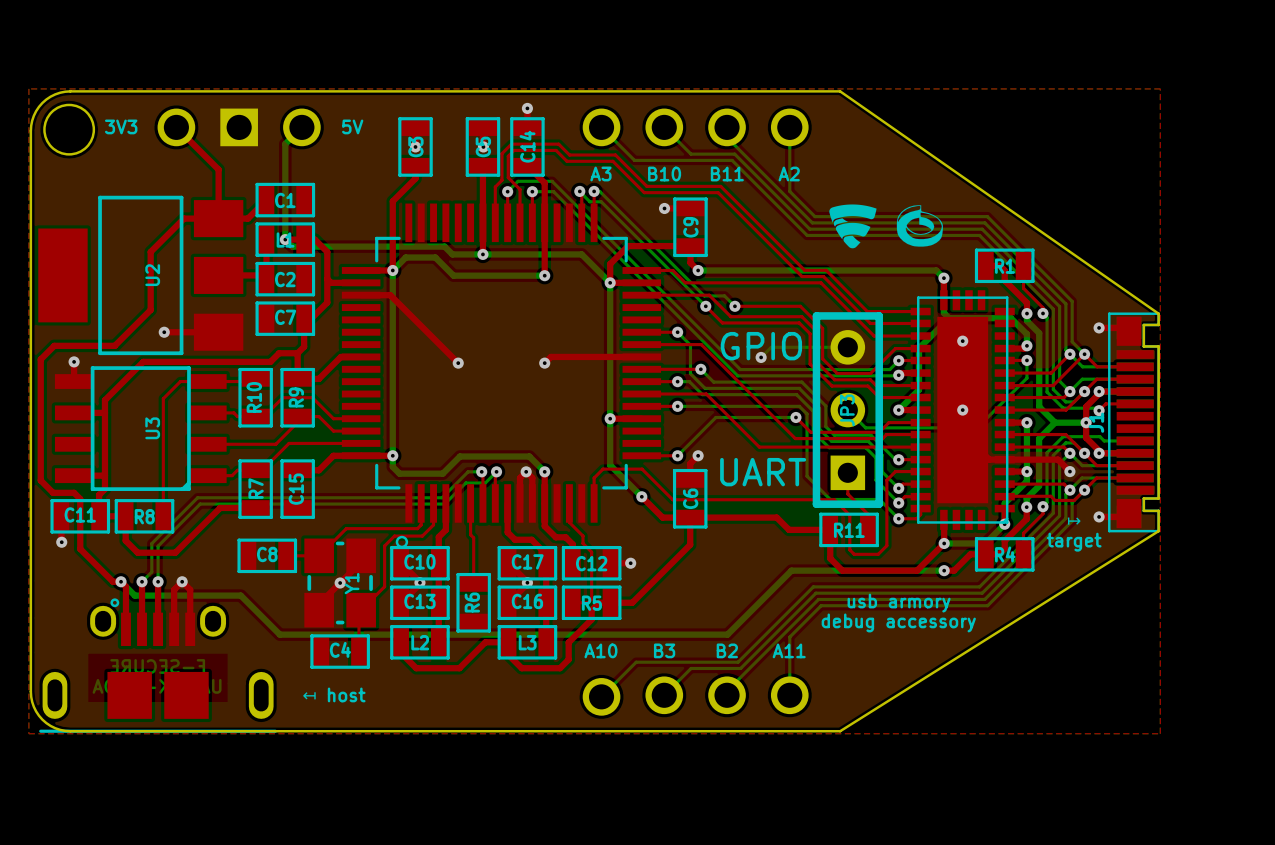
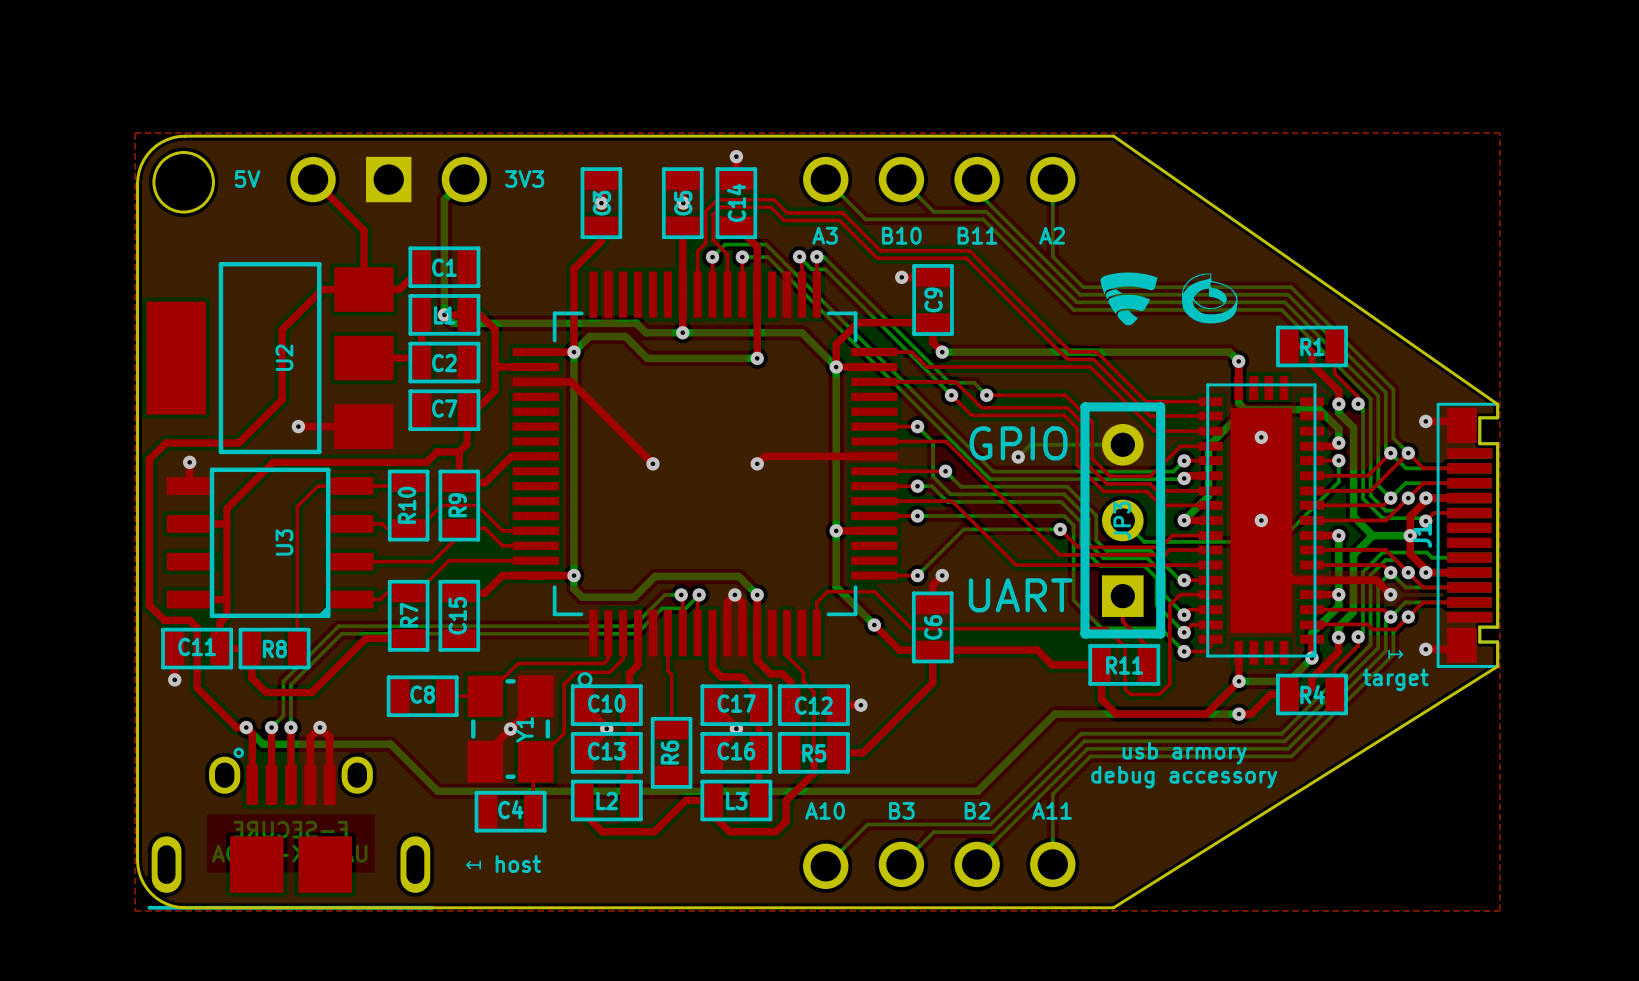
text: 3V3 (121, 126) -> 5V (247, 179)
text: 5V (352, 126) -> 3V3 (524, 179)

